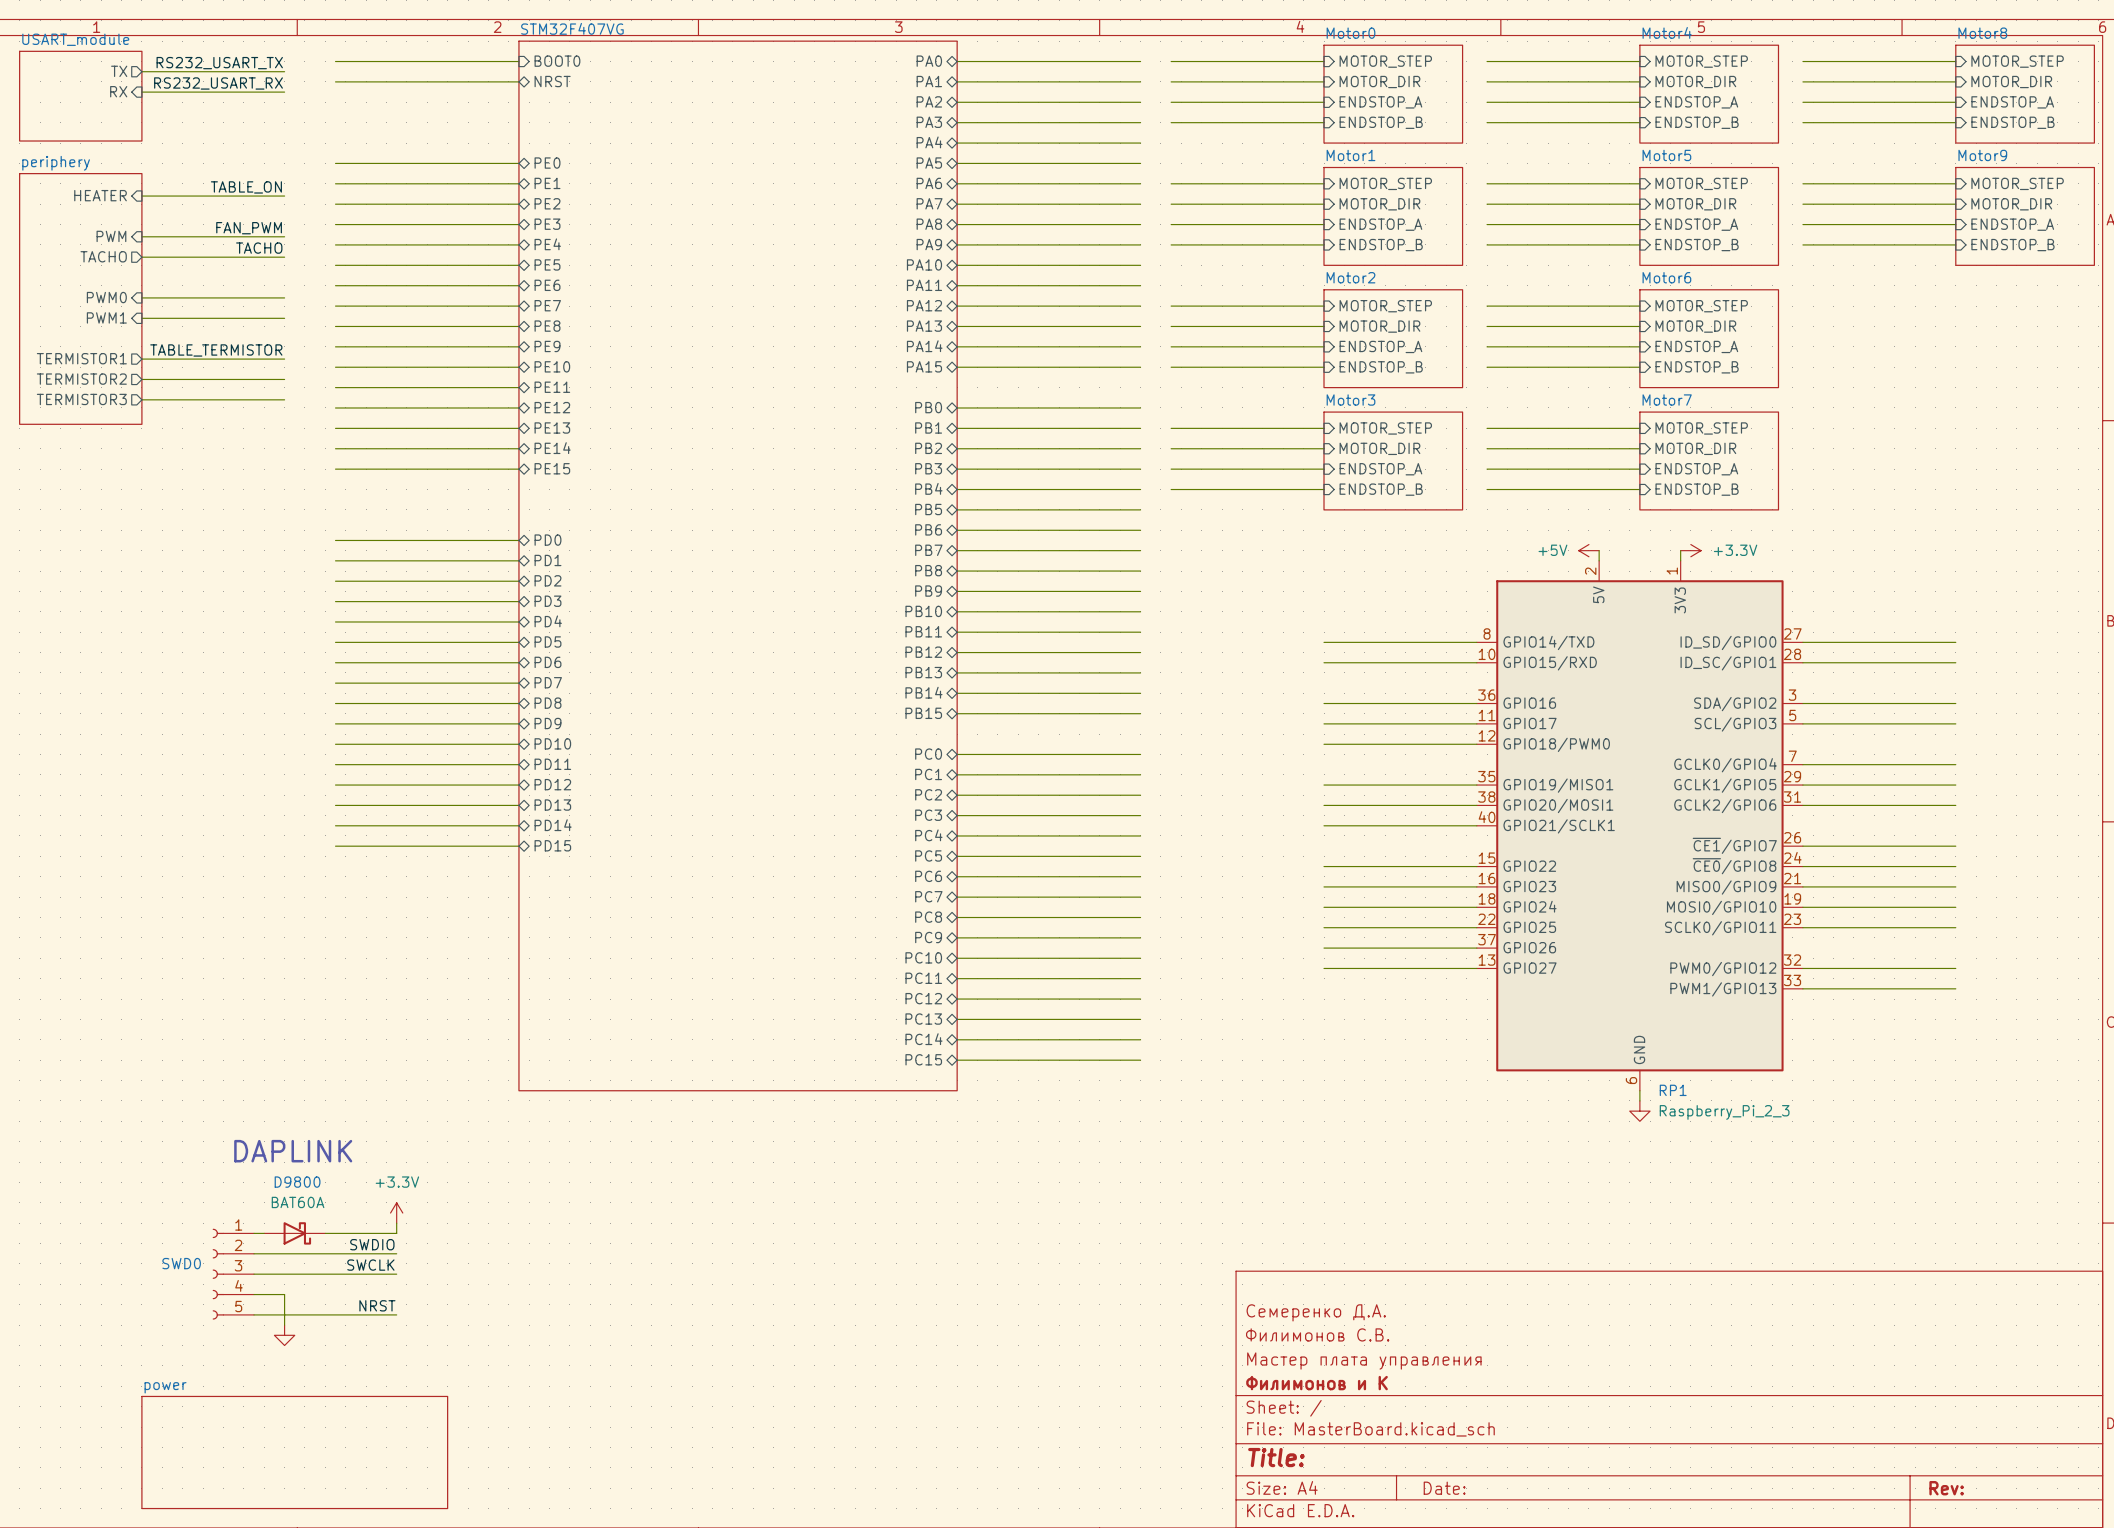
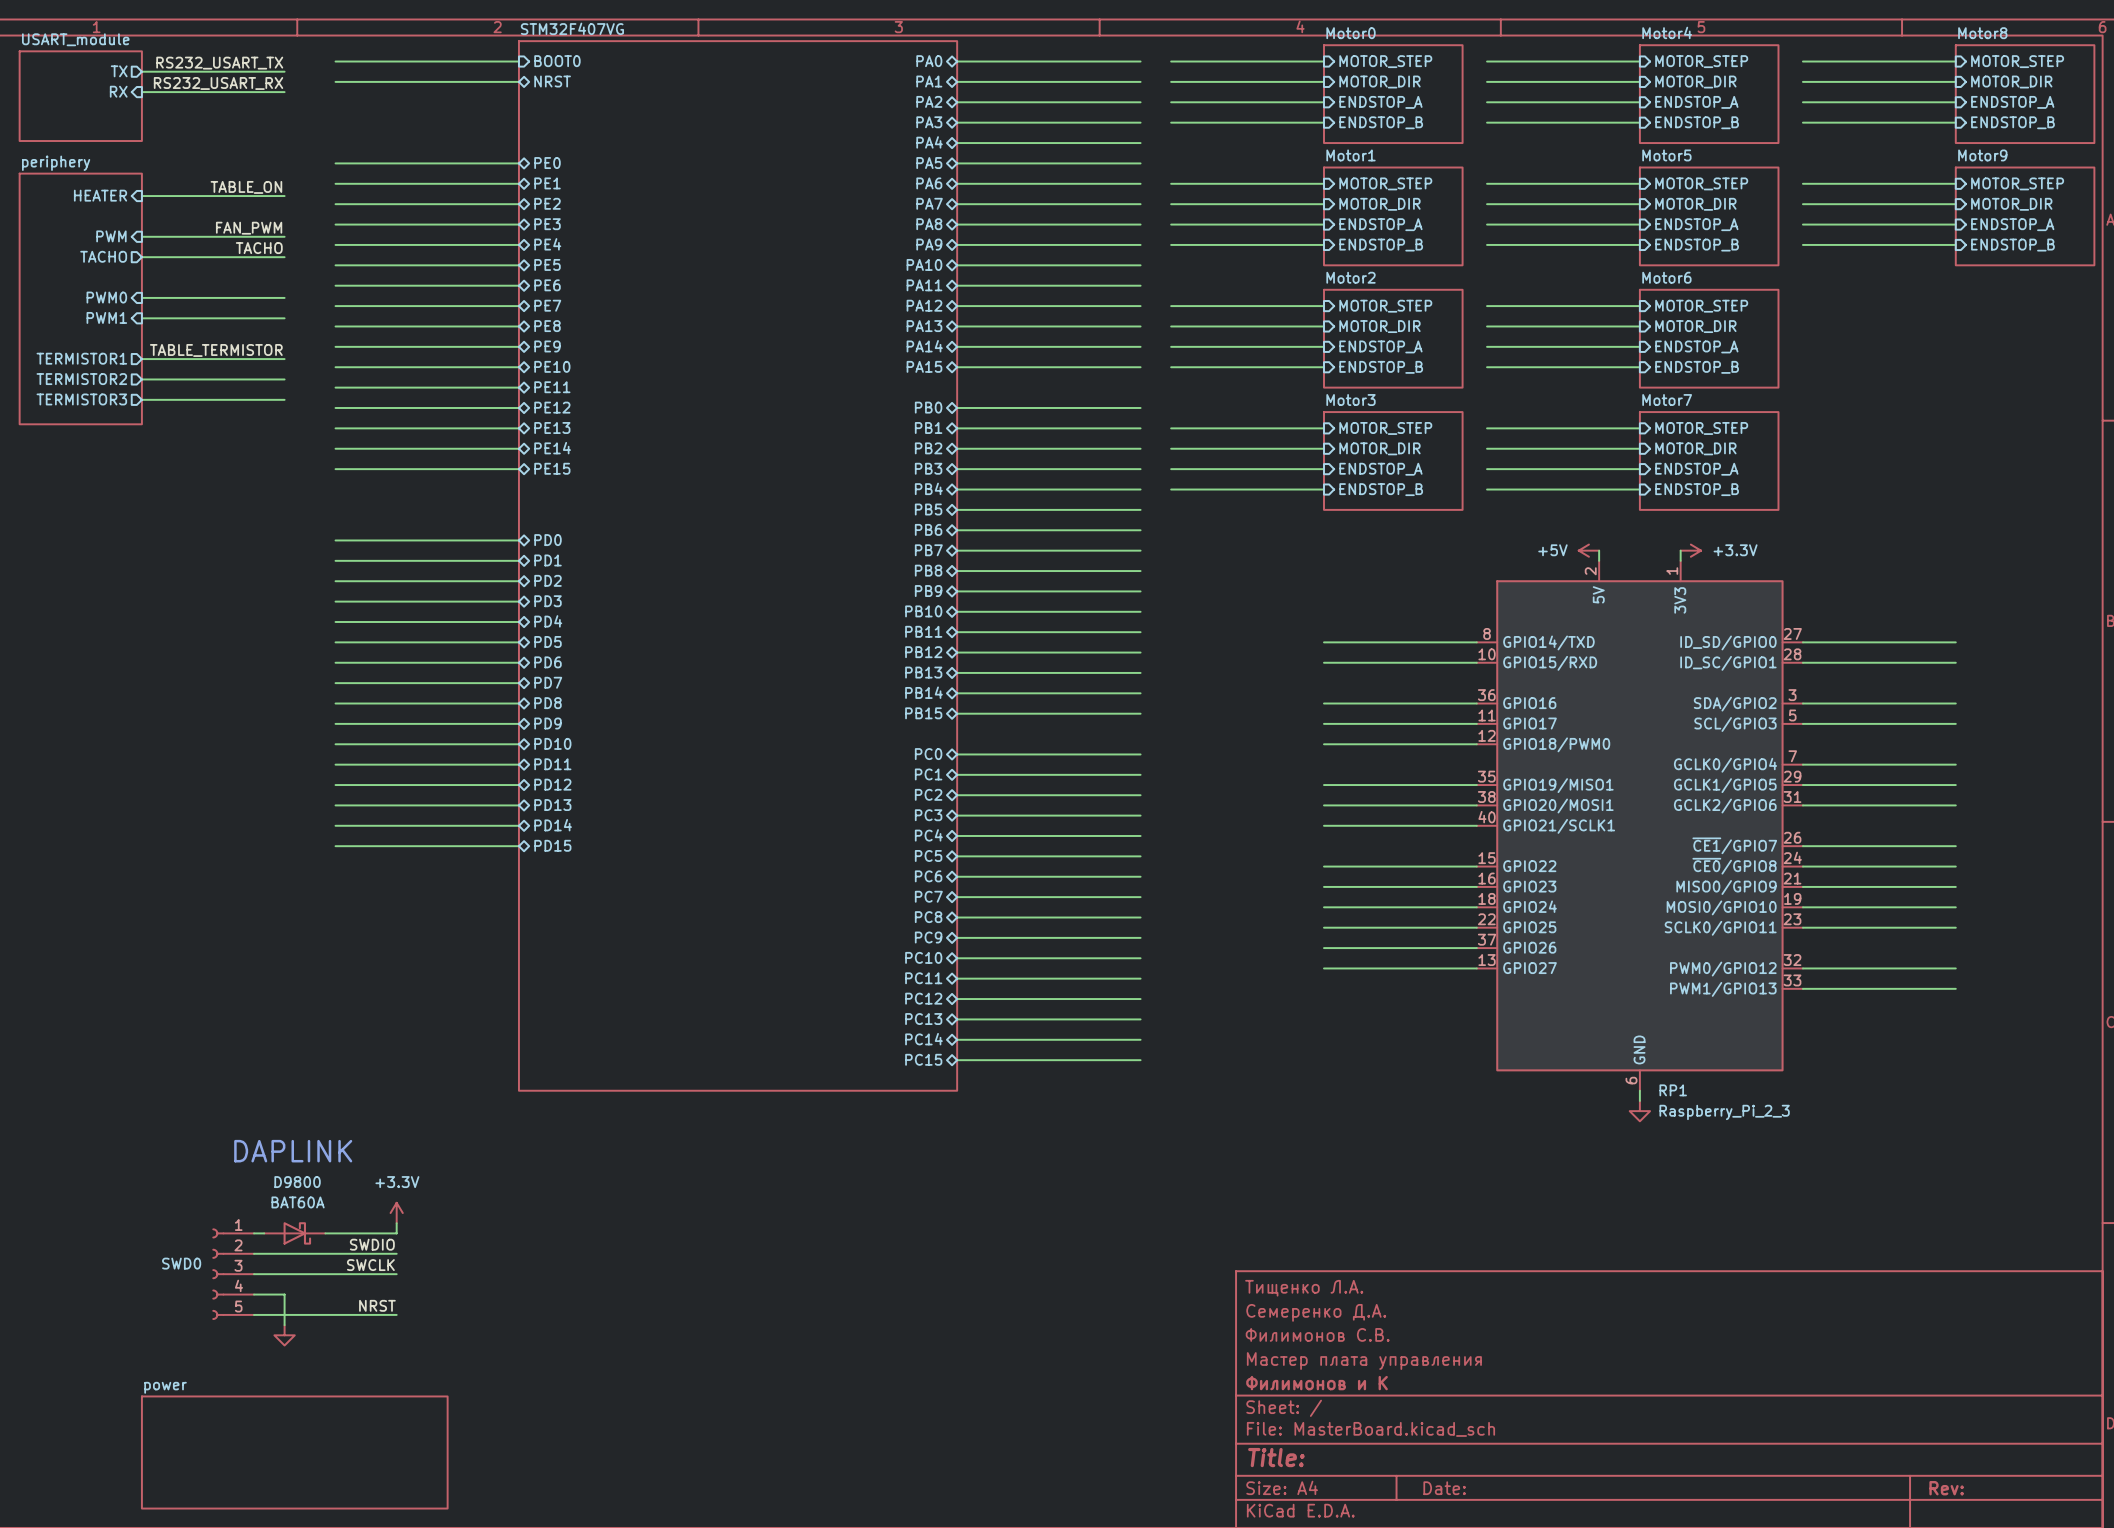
title block: none -> Тищенко Л.А. (1304, 1288)

